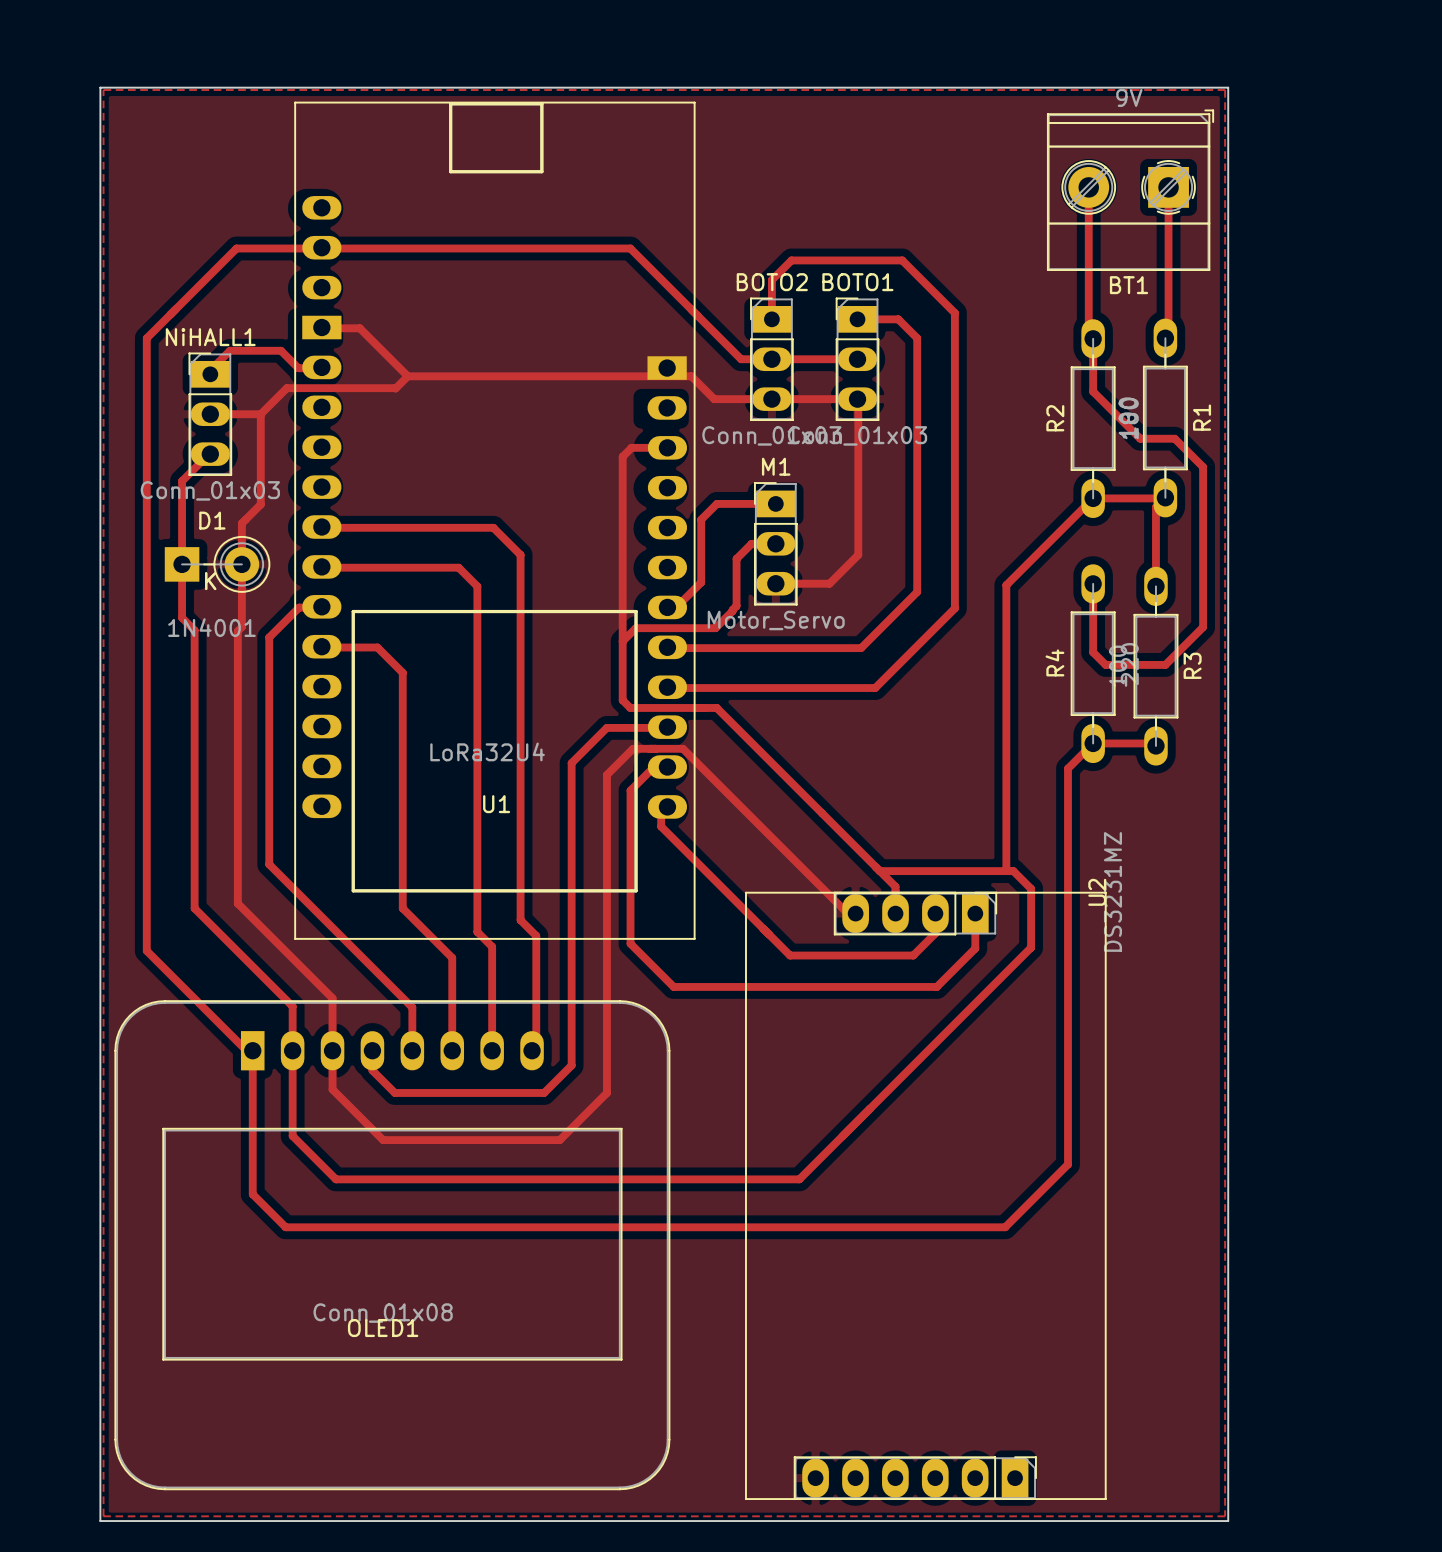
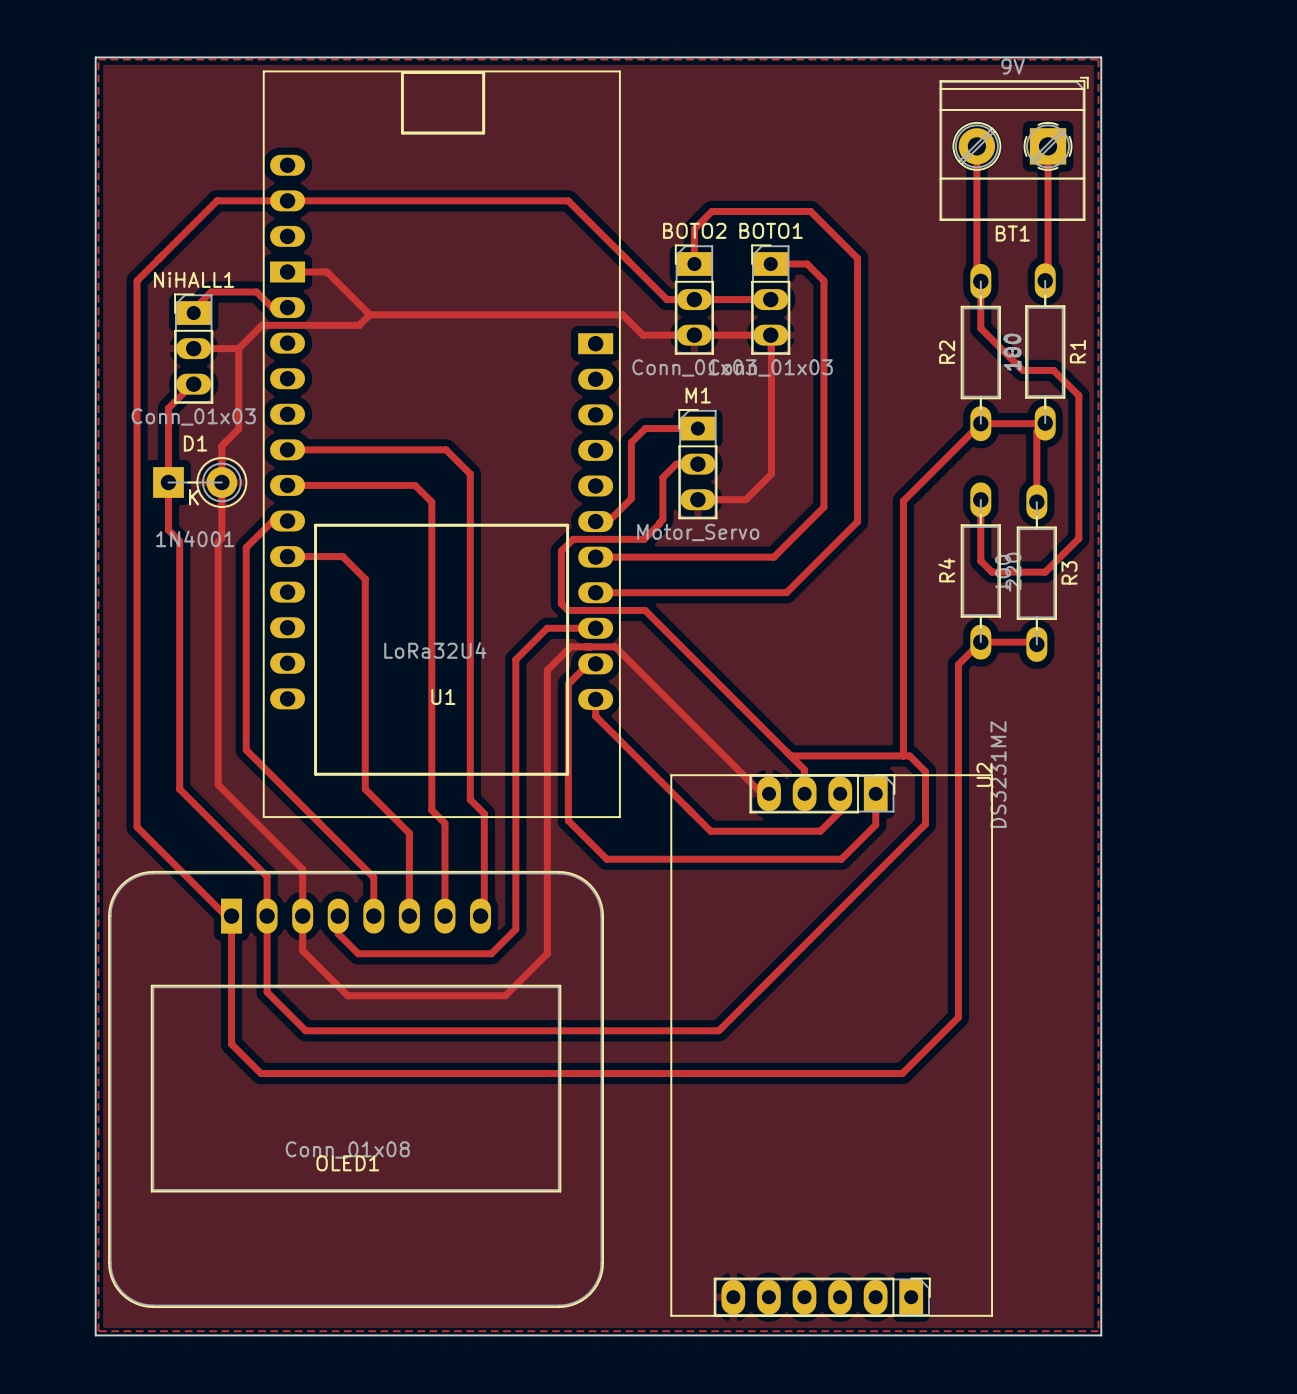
U1 footprint: [294, 101, 696, 940] -> [262, 70, 621, 818]
track: (667, 447) (631, 447) (622, 456) (622, 641) -> none

